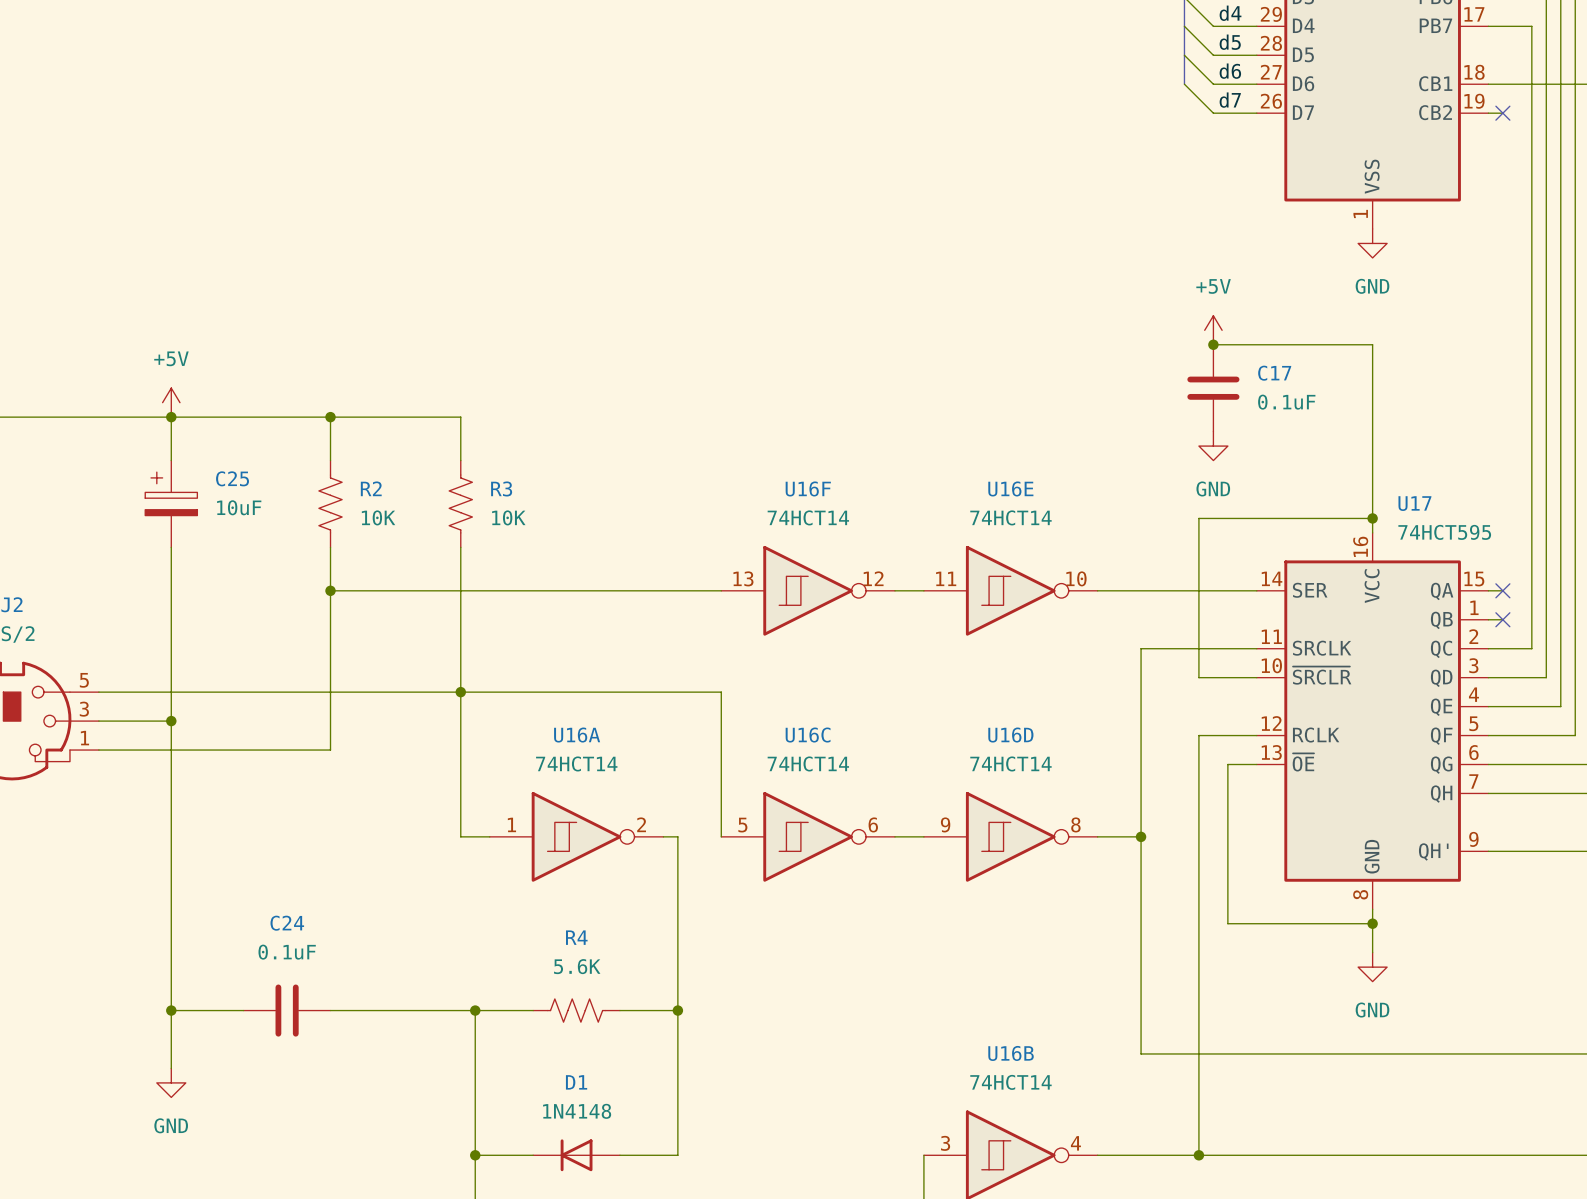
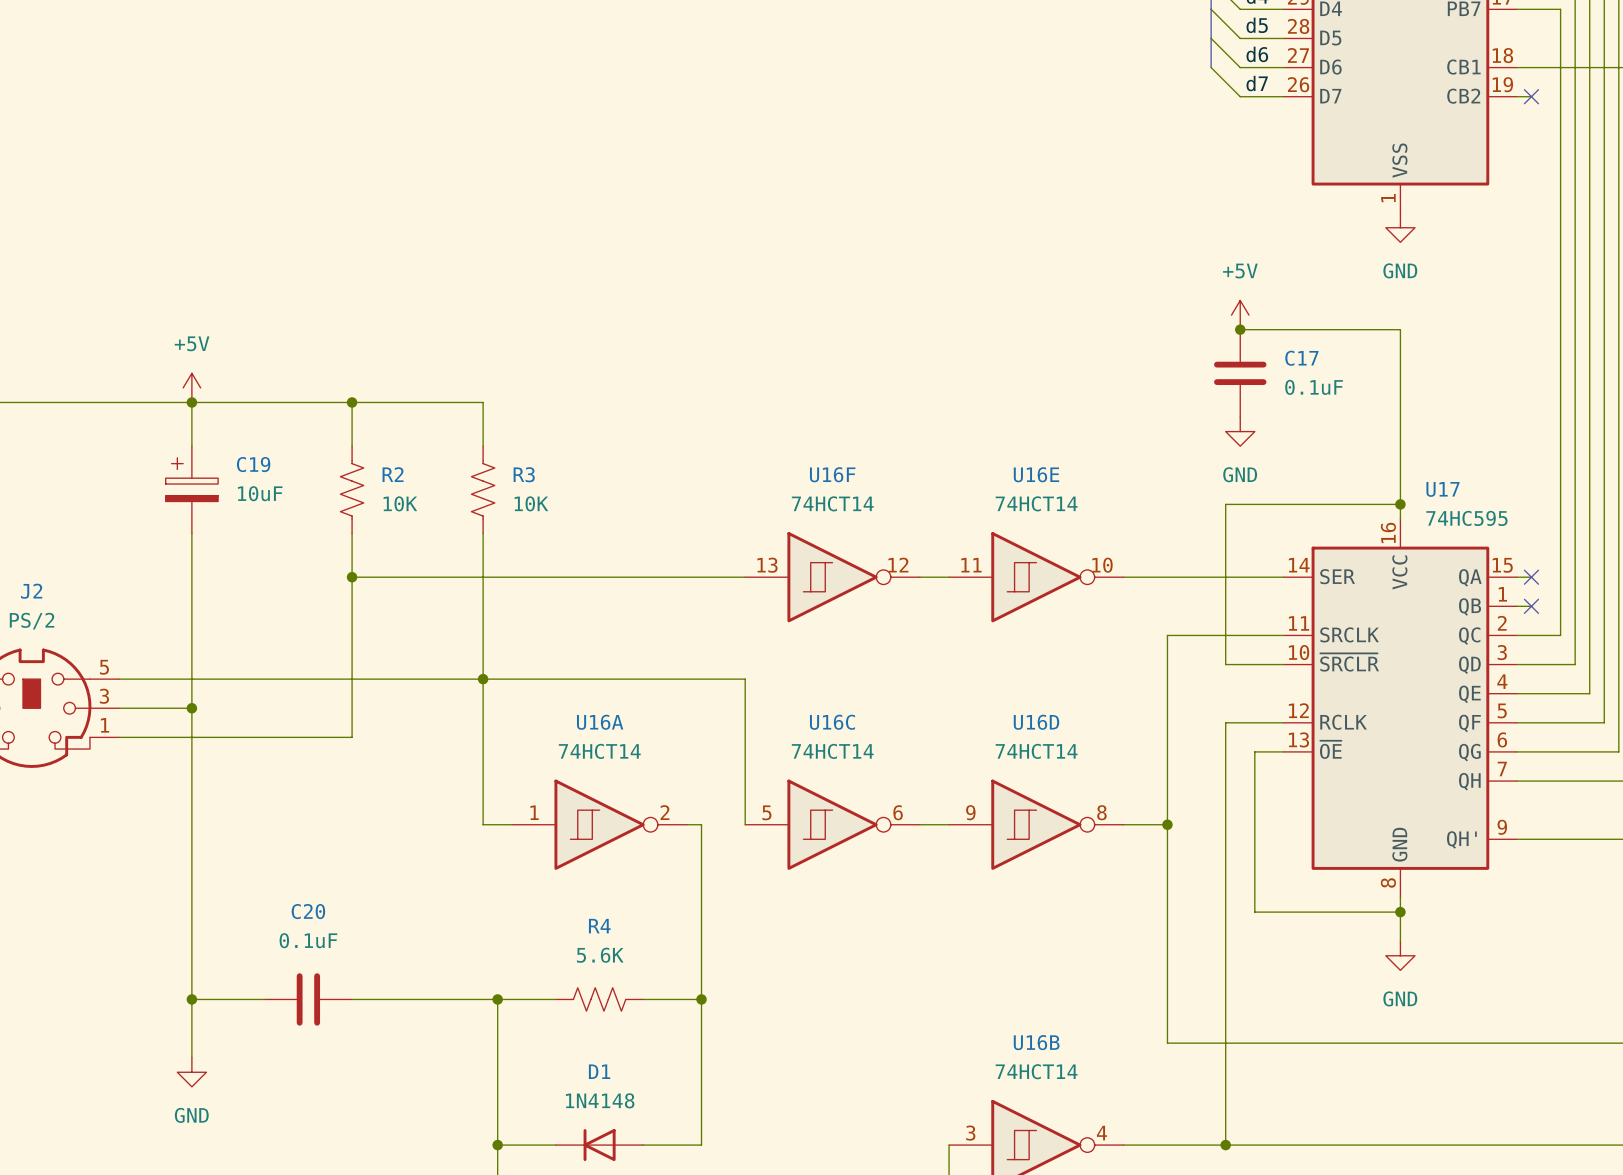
C25 name: C25 (232, 478) -> C19 (253, 464)
U17 value: 74HCT595 (1444, 532) -> 74HC595 (1466, 518)
C24 name: C24 (287, 923) -> C20 (308, 911)

